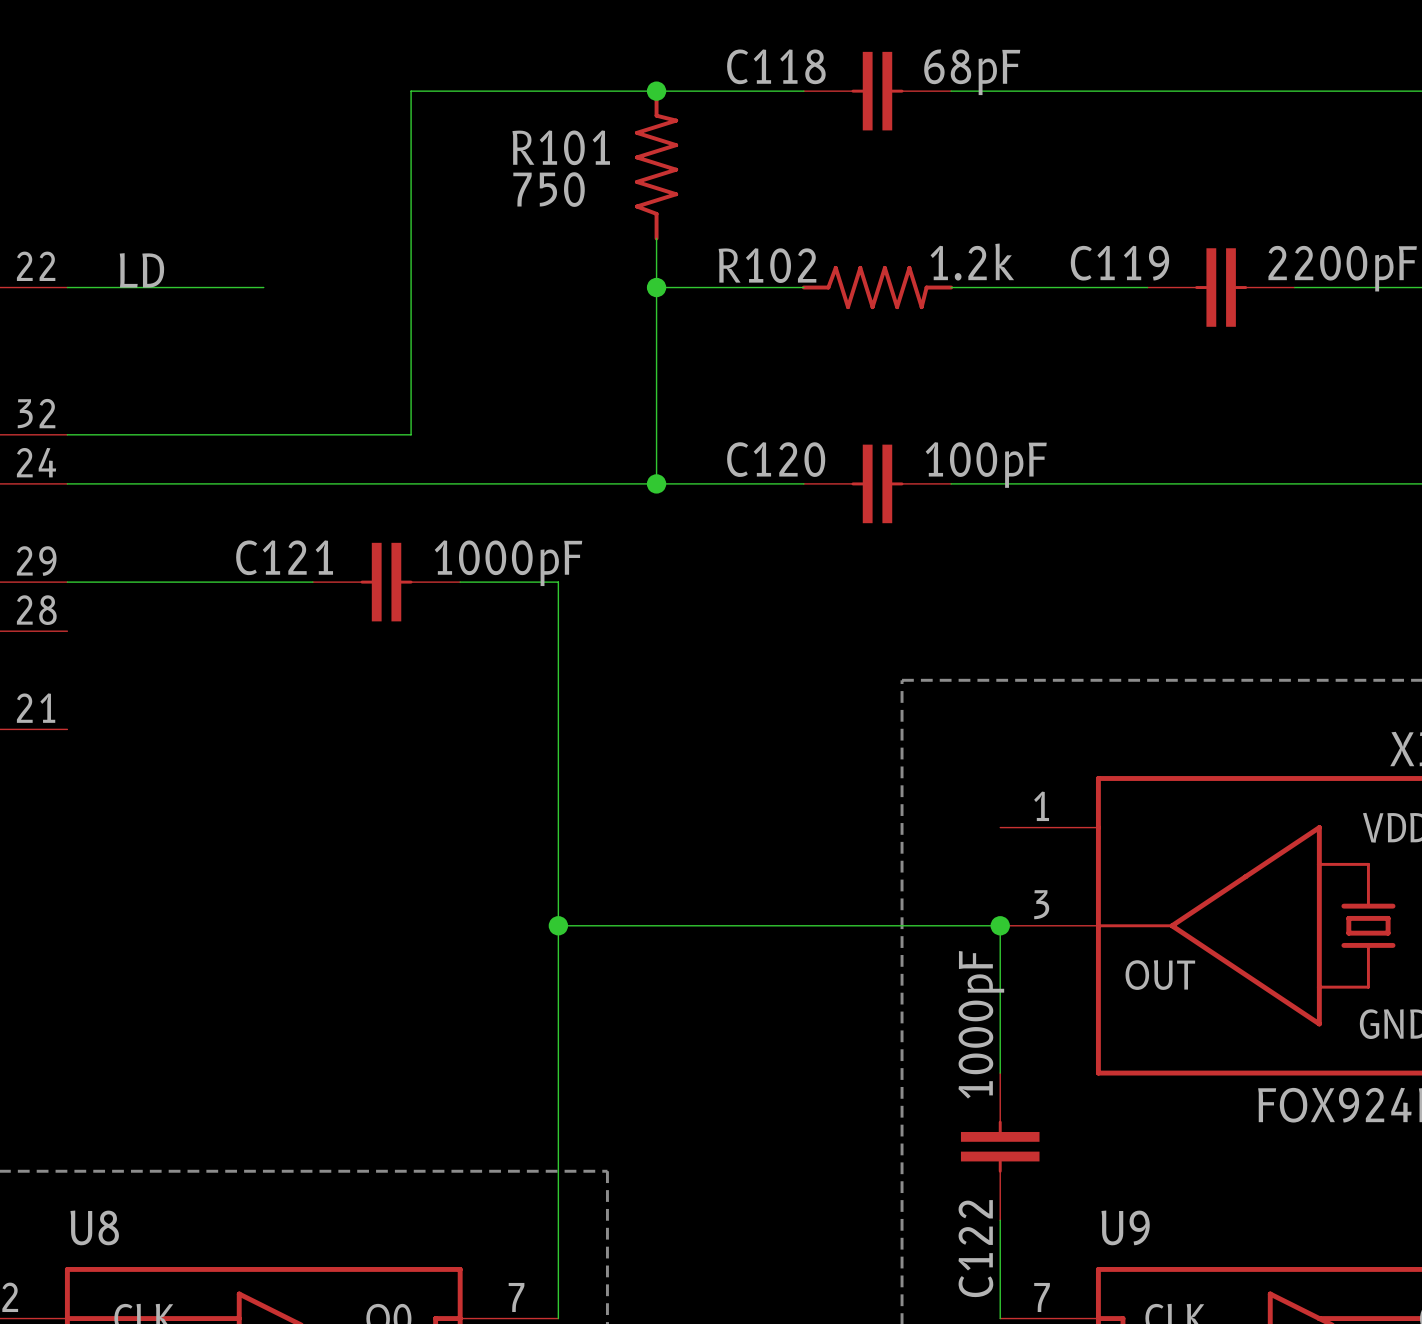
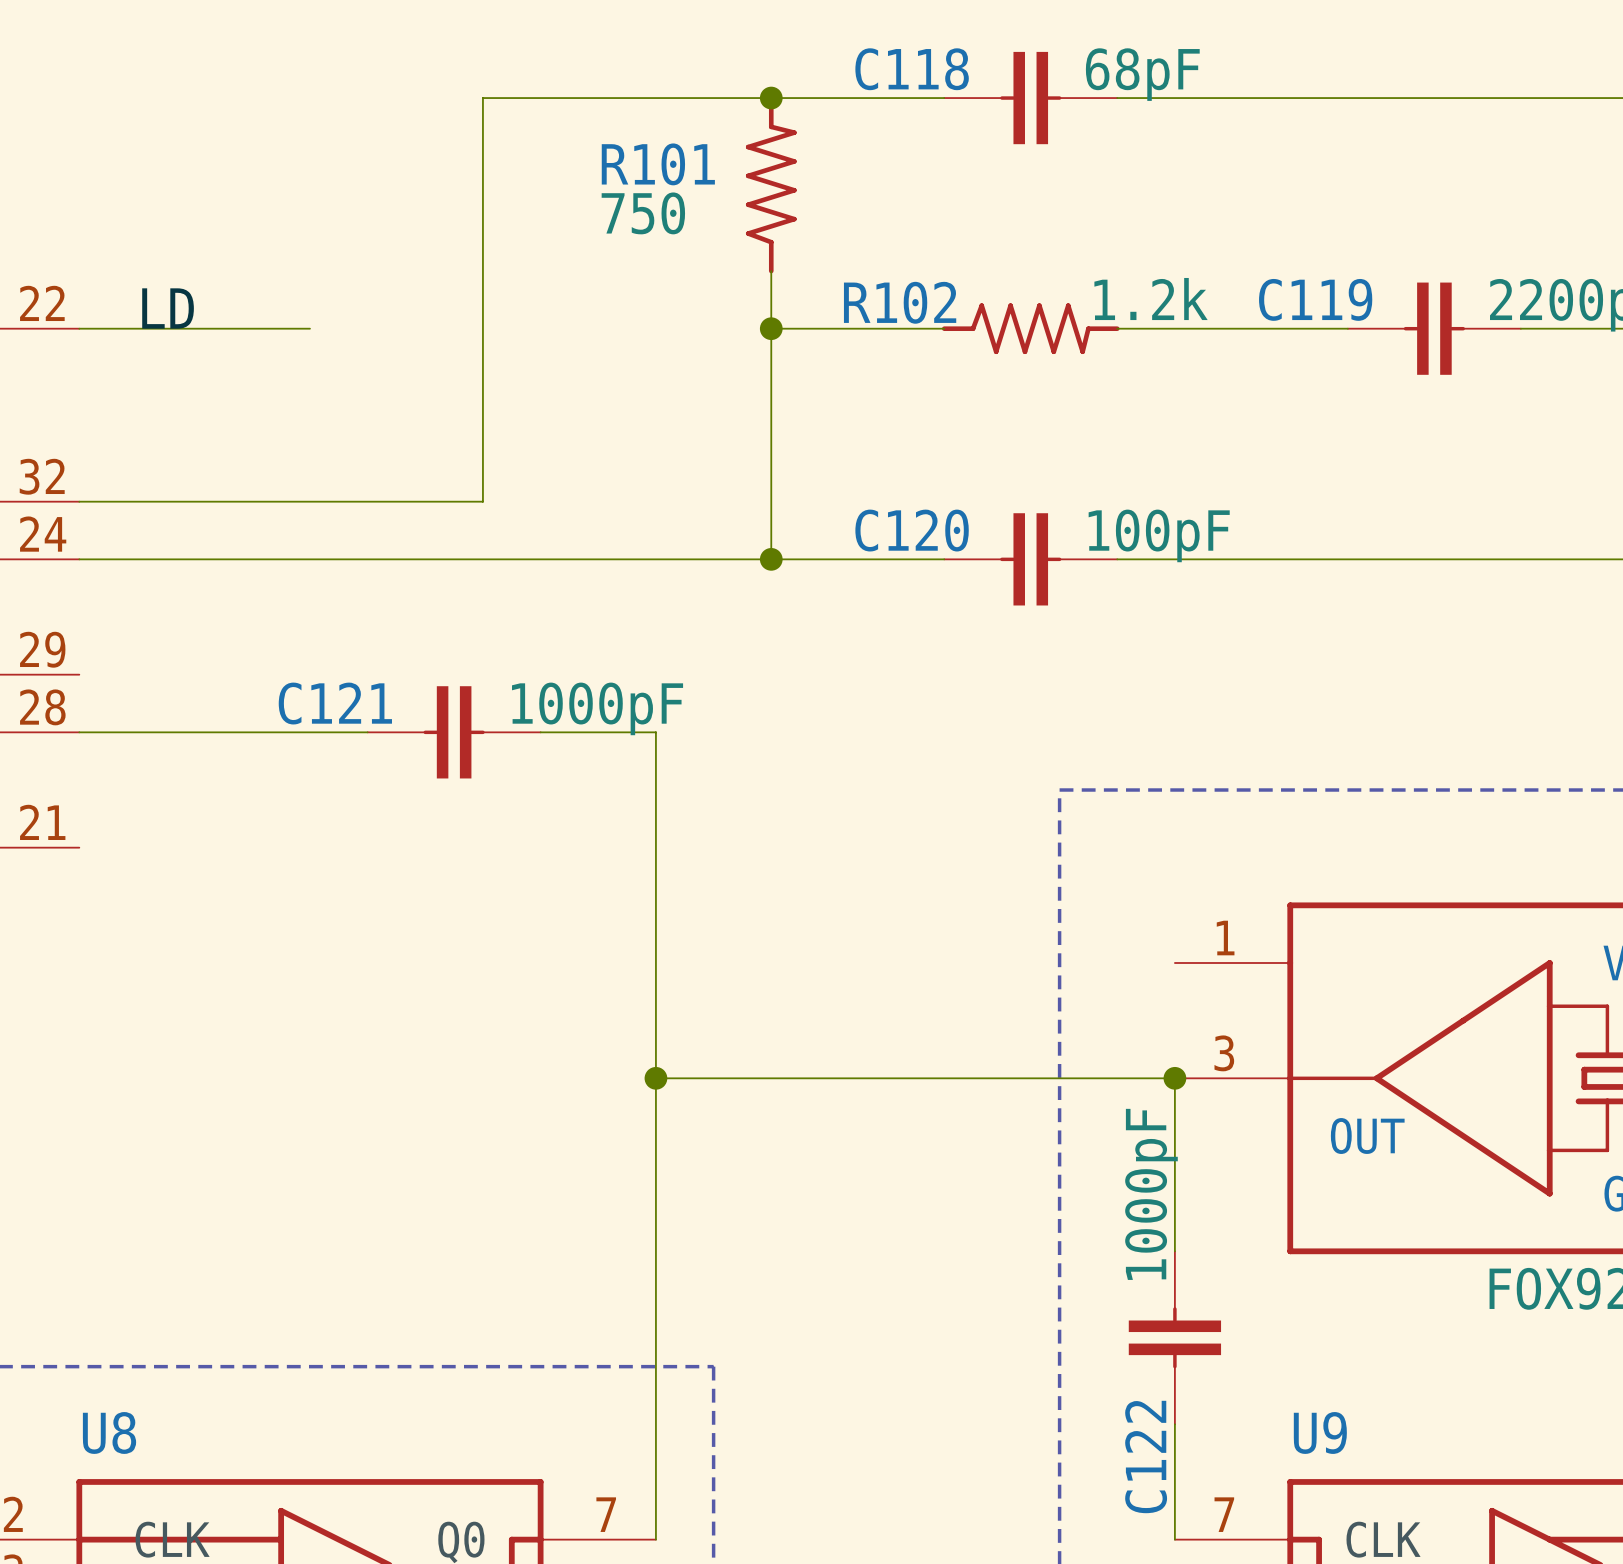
wire: (67, 582) (312, 582) -> (79, 732) (367, 732)
C121 position: (386, 582) -> (454, 732)
wire: (460, 582) (558, 582) (558, 631) -> (540, 732) (655, 732)

